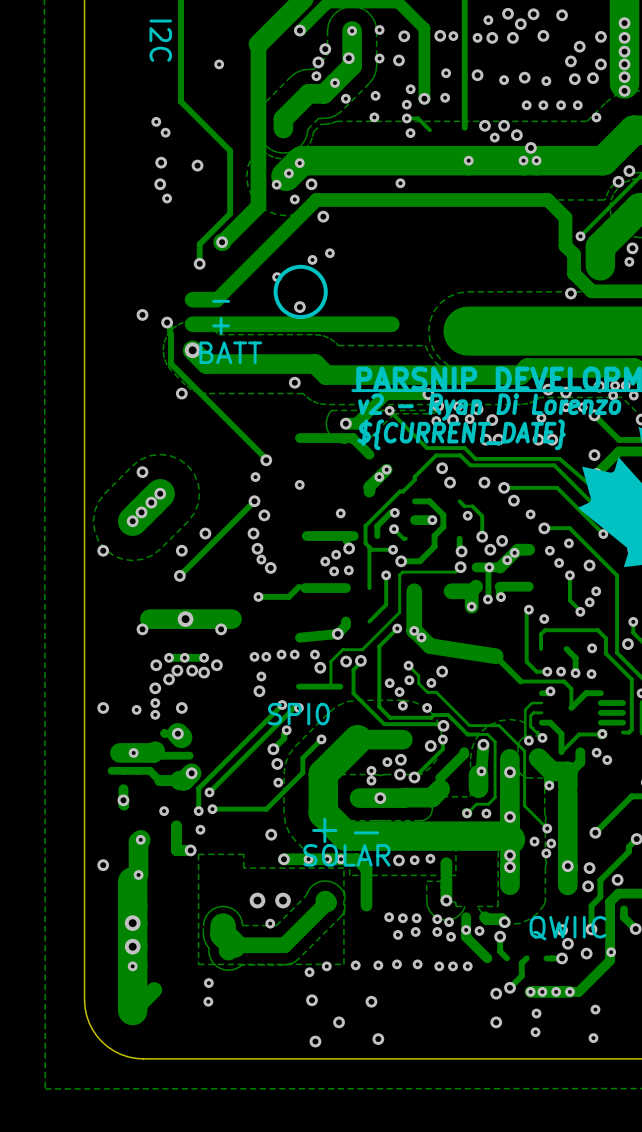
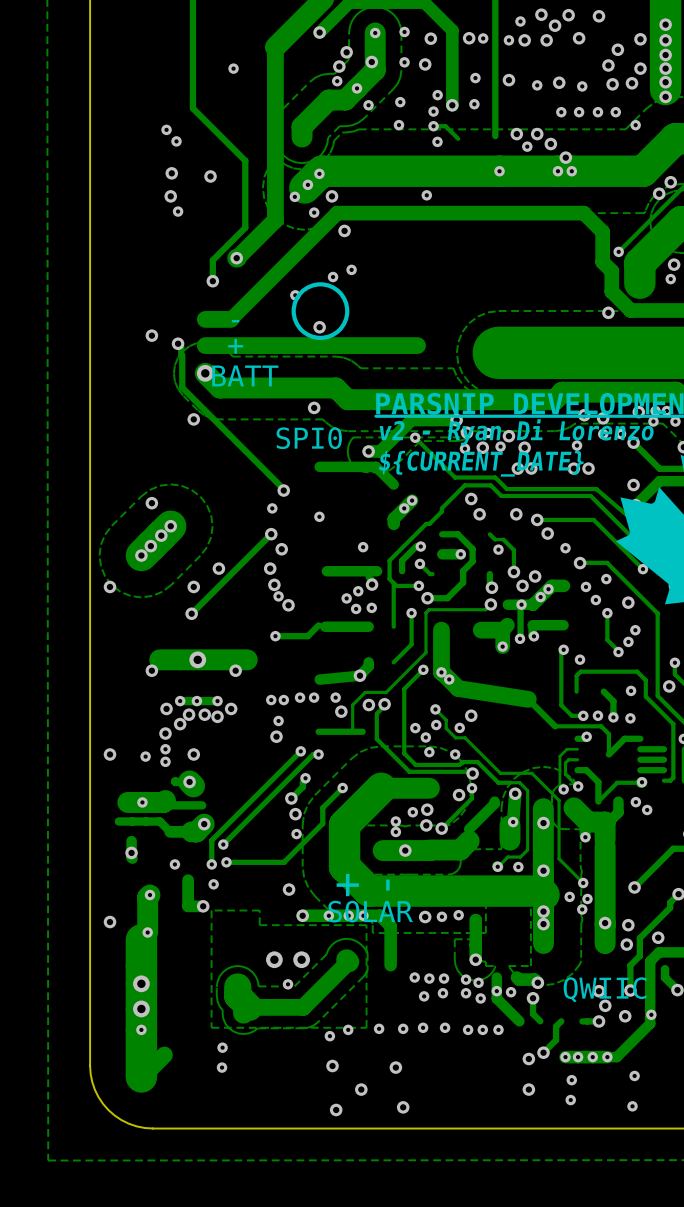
text: I2C (160, 40) -> none
text position: SPI0 (298, 714) -> SPI0 (309, 438)
text rotation: 0° (366, 832) -> 90° clockwise (387, 885)

